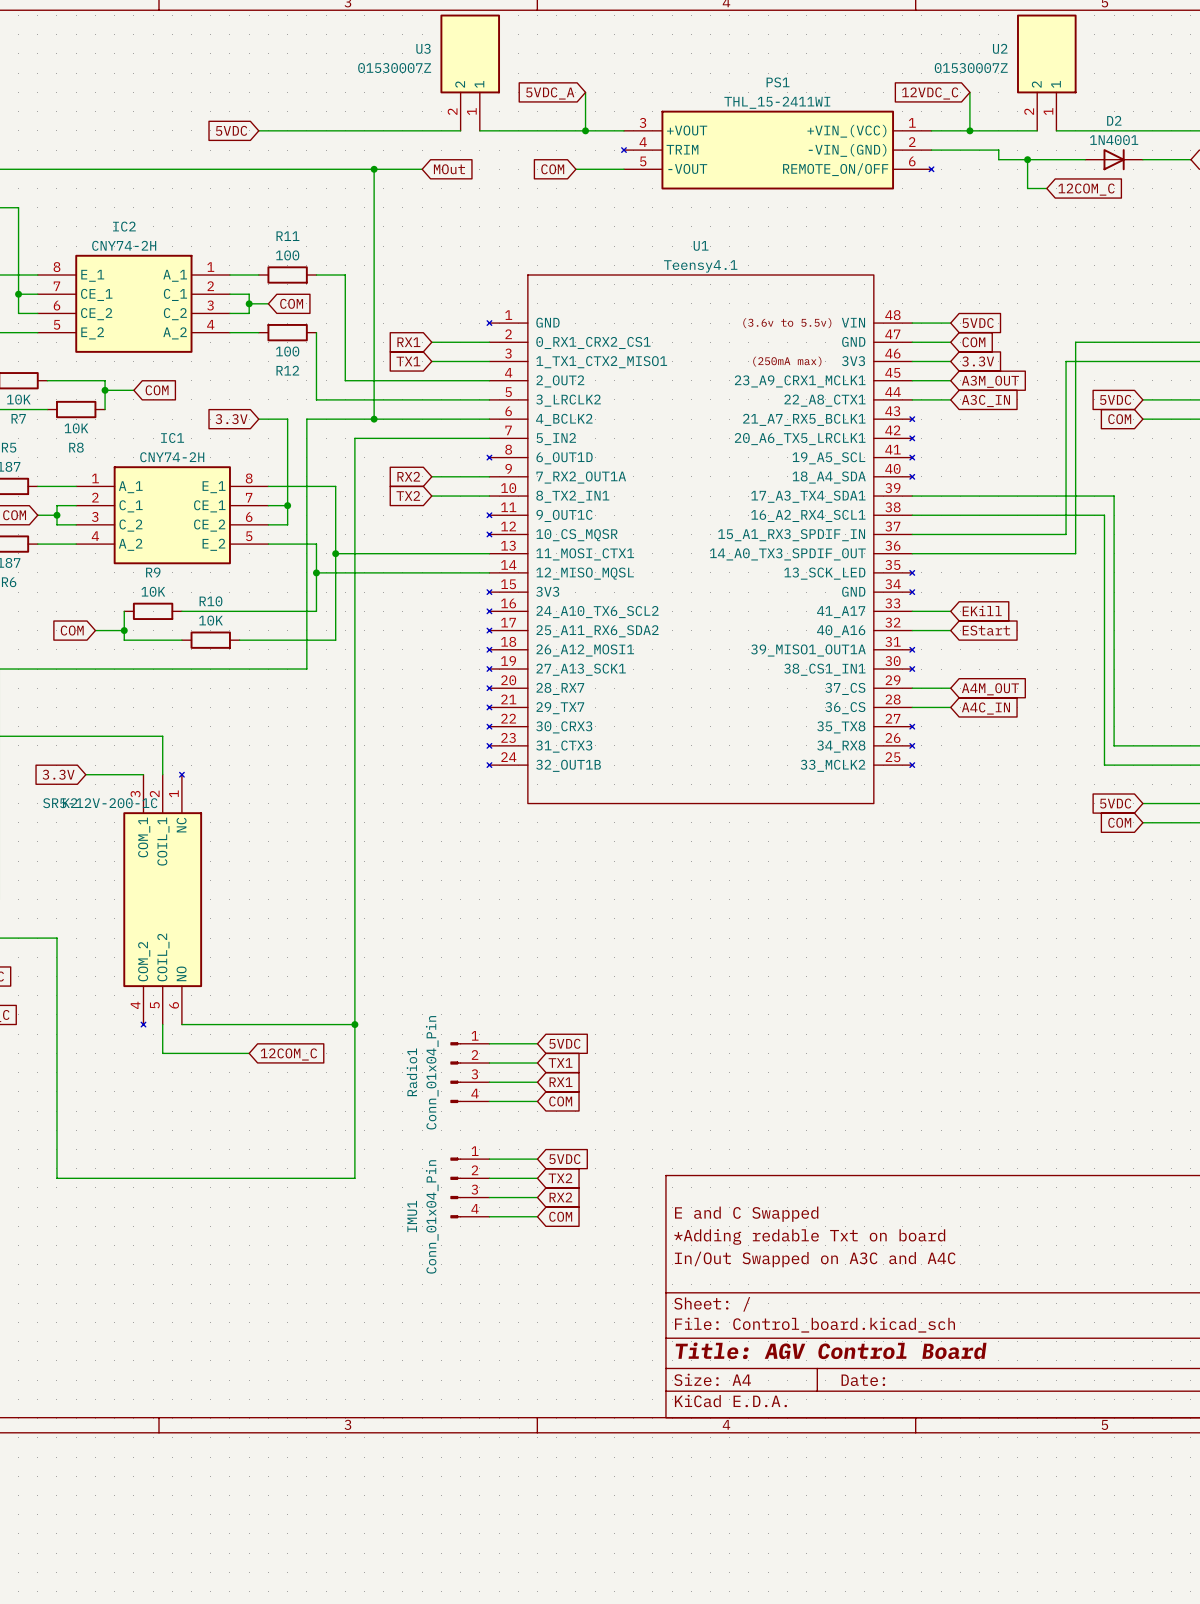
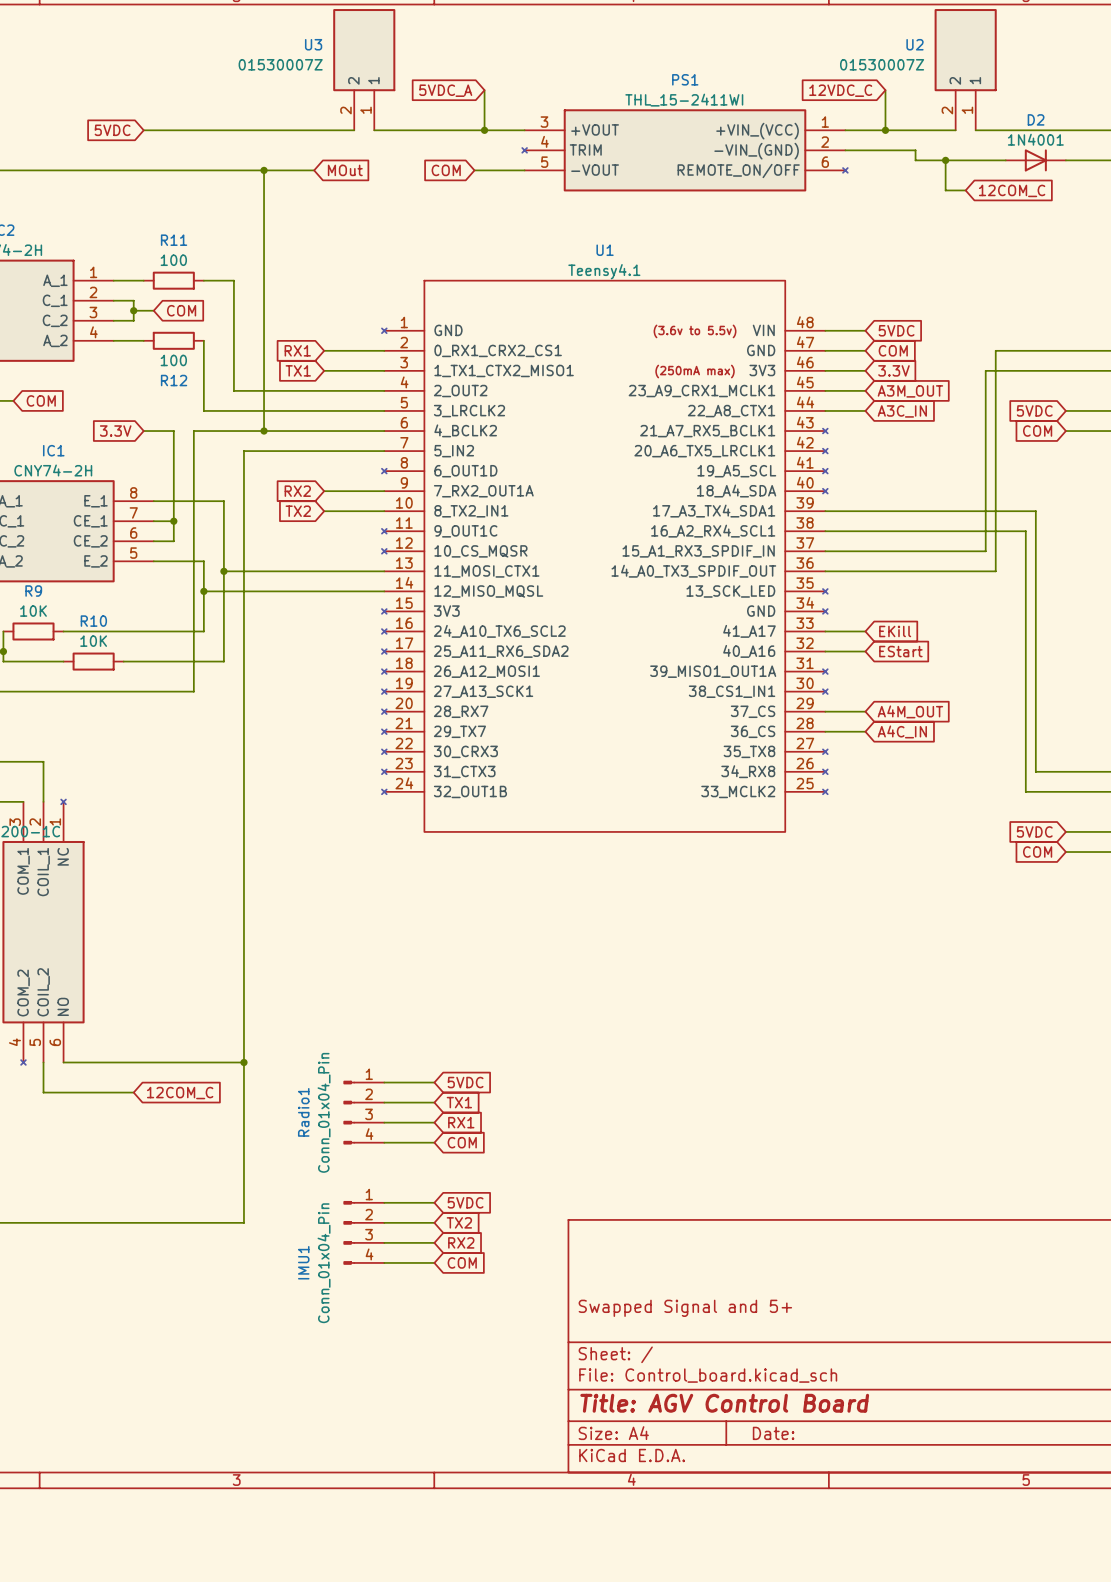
title block: E and C Swapped (746, 1214) -> none
title block: *Adding redable Txt on board (809, 1236) -> none
title block: In/Out Swapped on A3C and A4C (815, 1259) -> Swapped Signal and 5+ (685, 1308)

